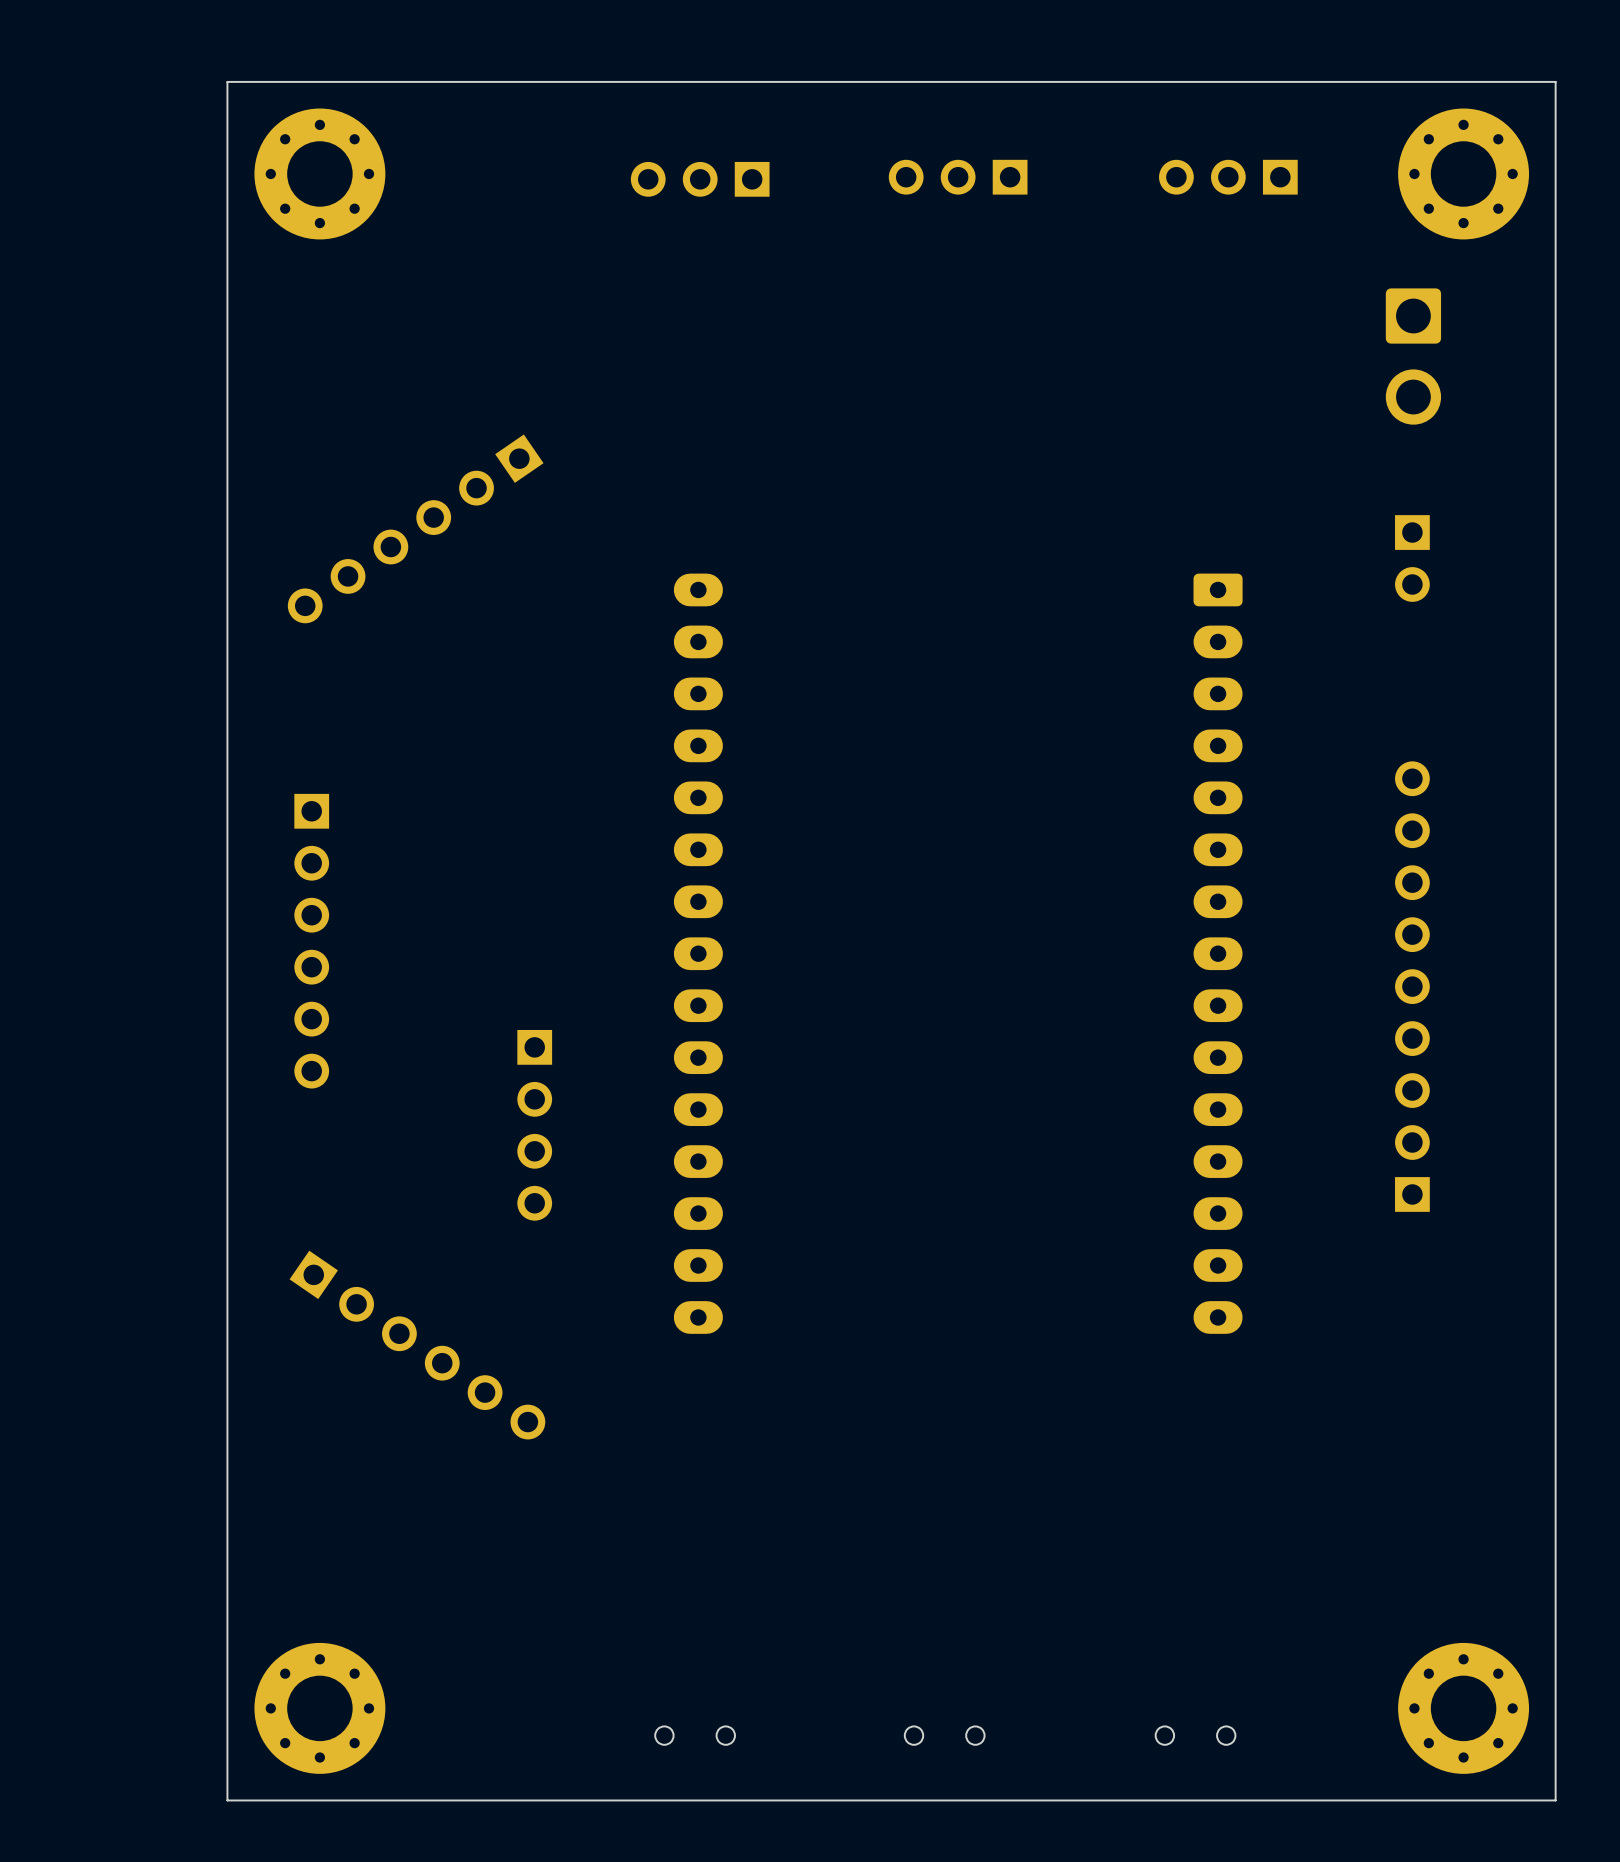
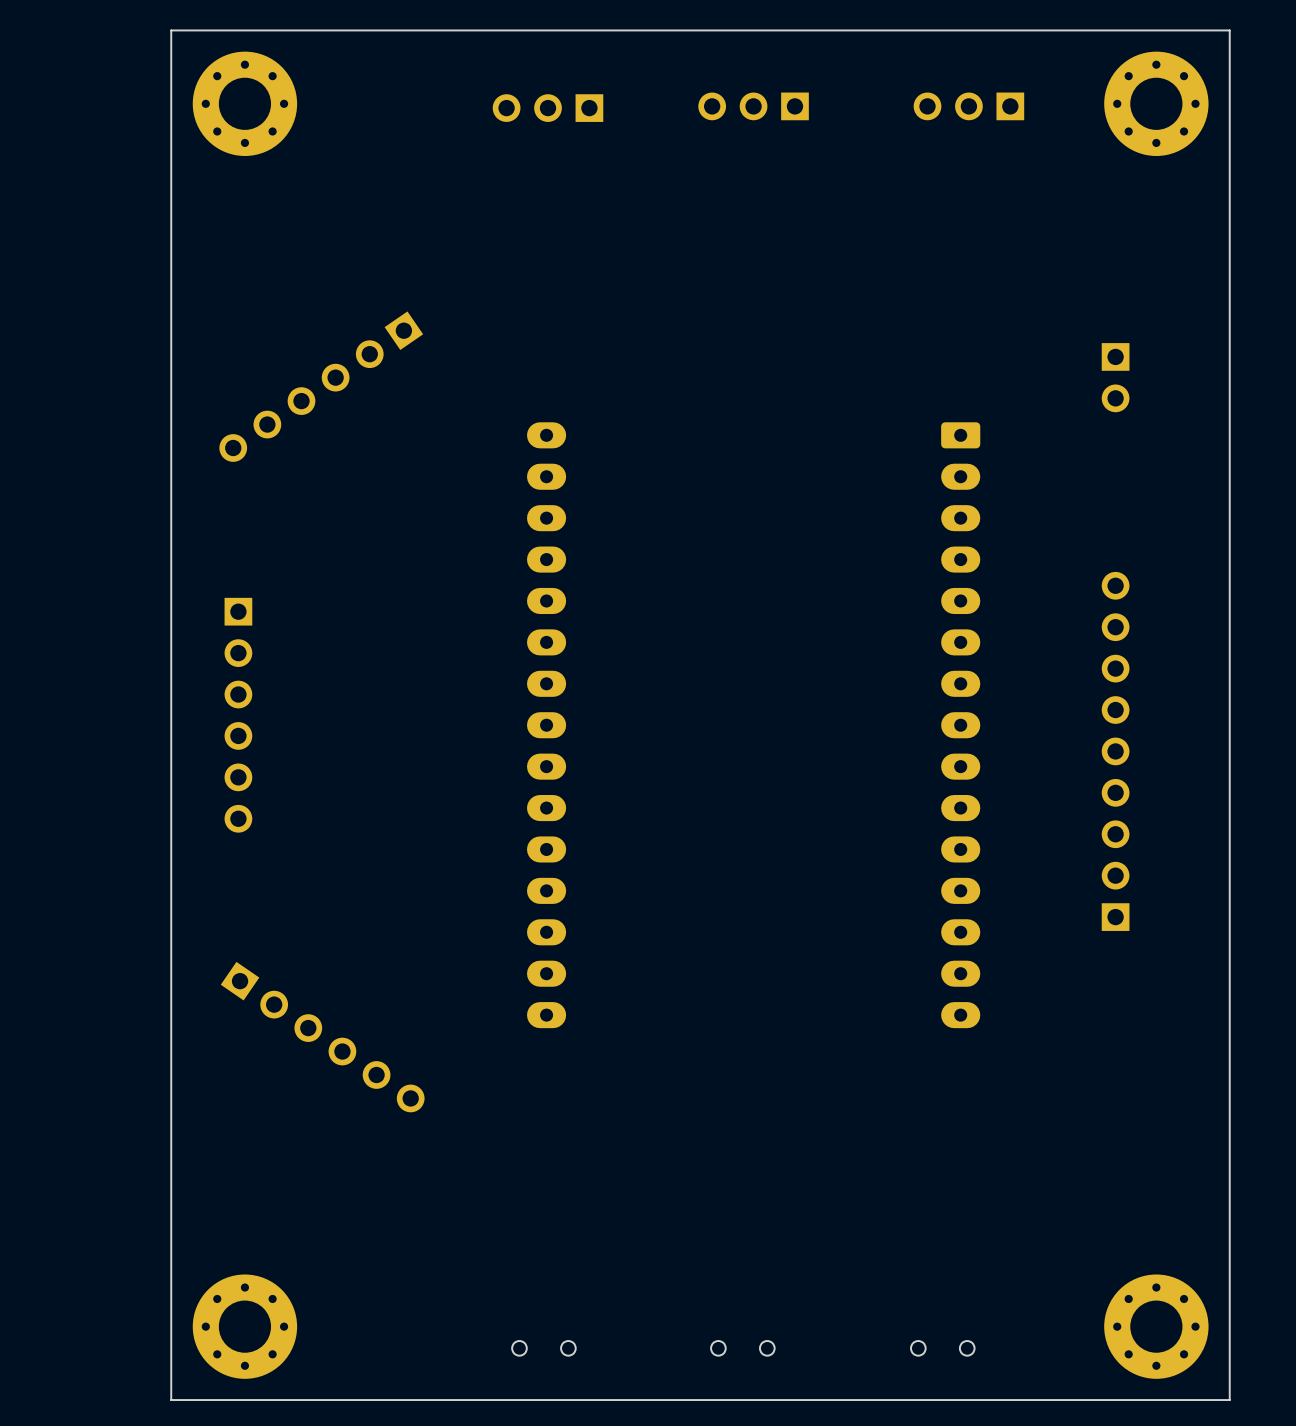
part: (1413, 356) -> none
part position: (1412, 558) -> (1115, 377)
part: (534, 1125) -> none

